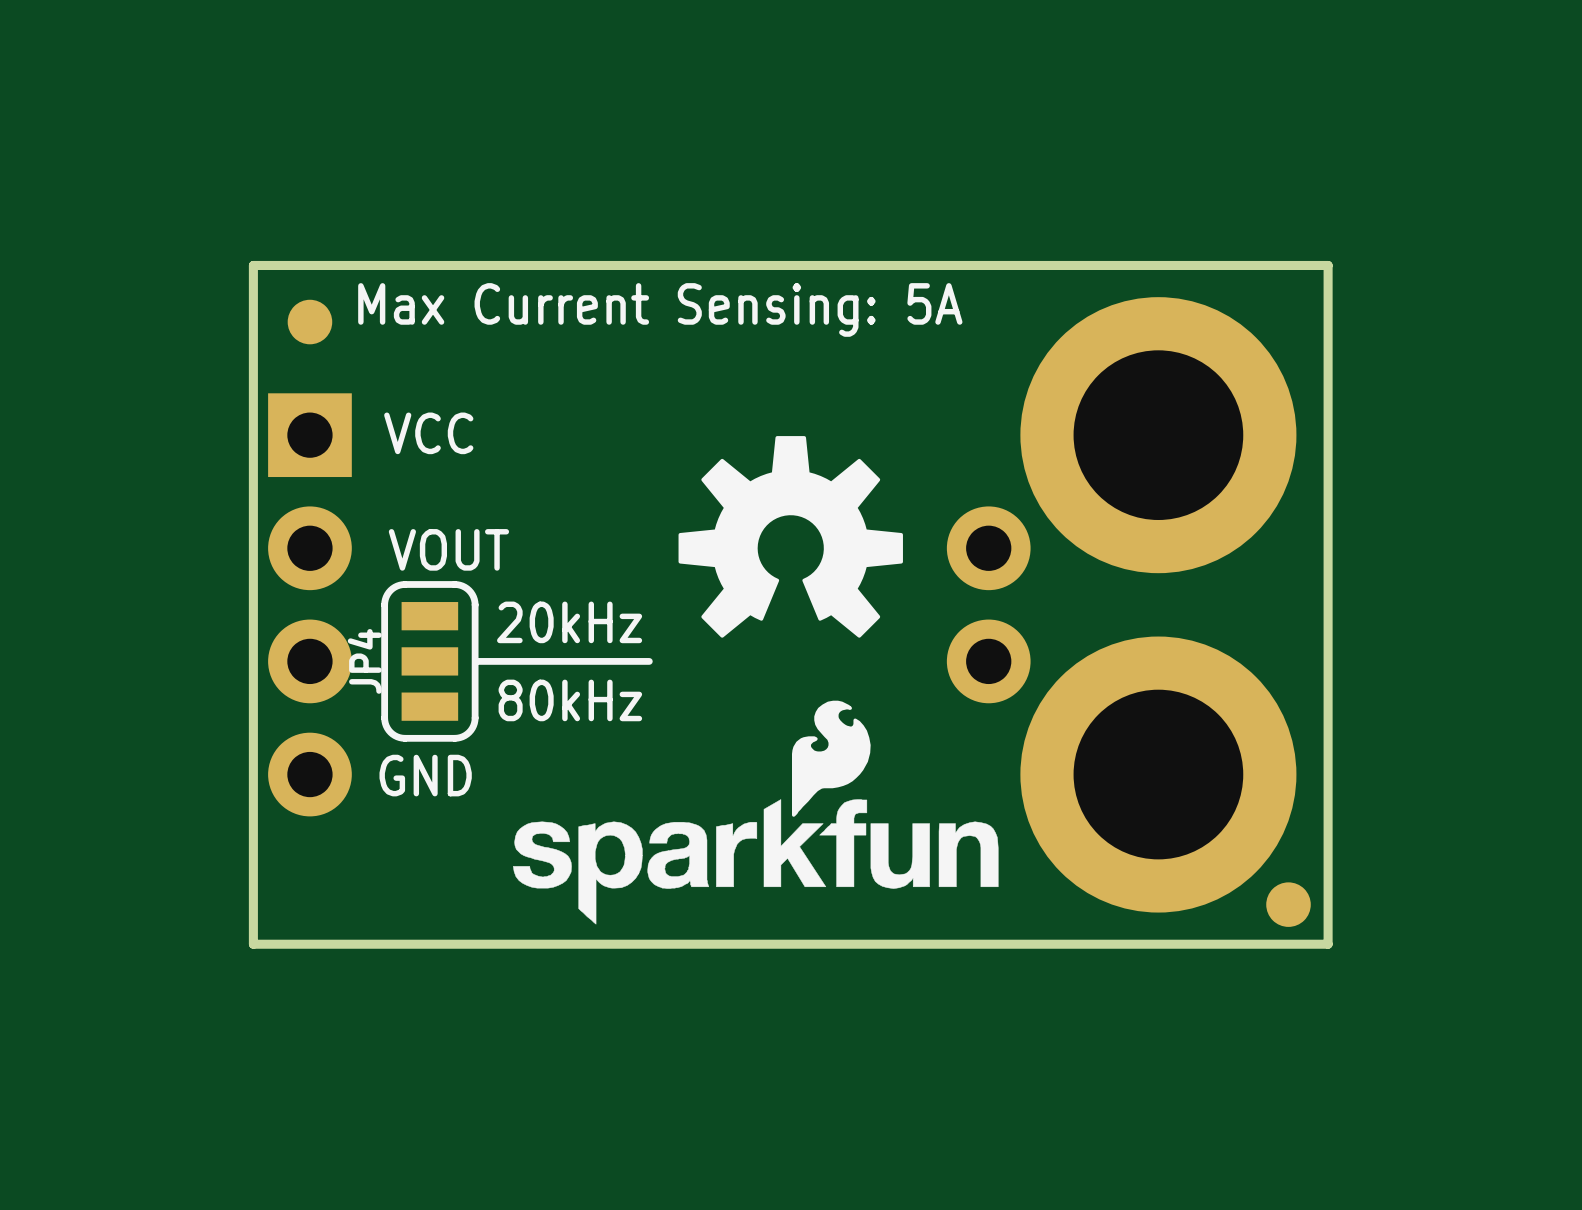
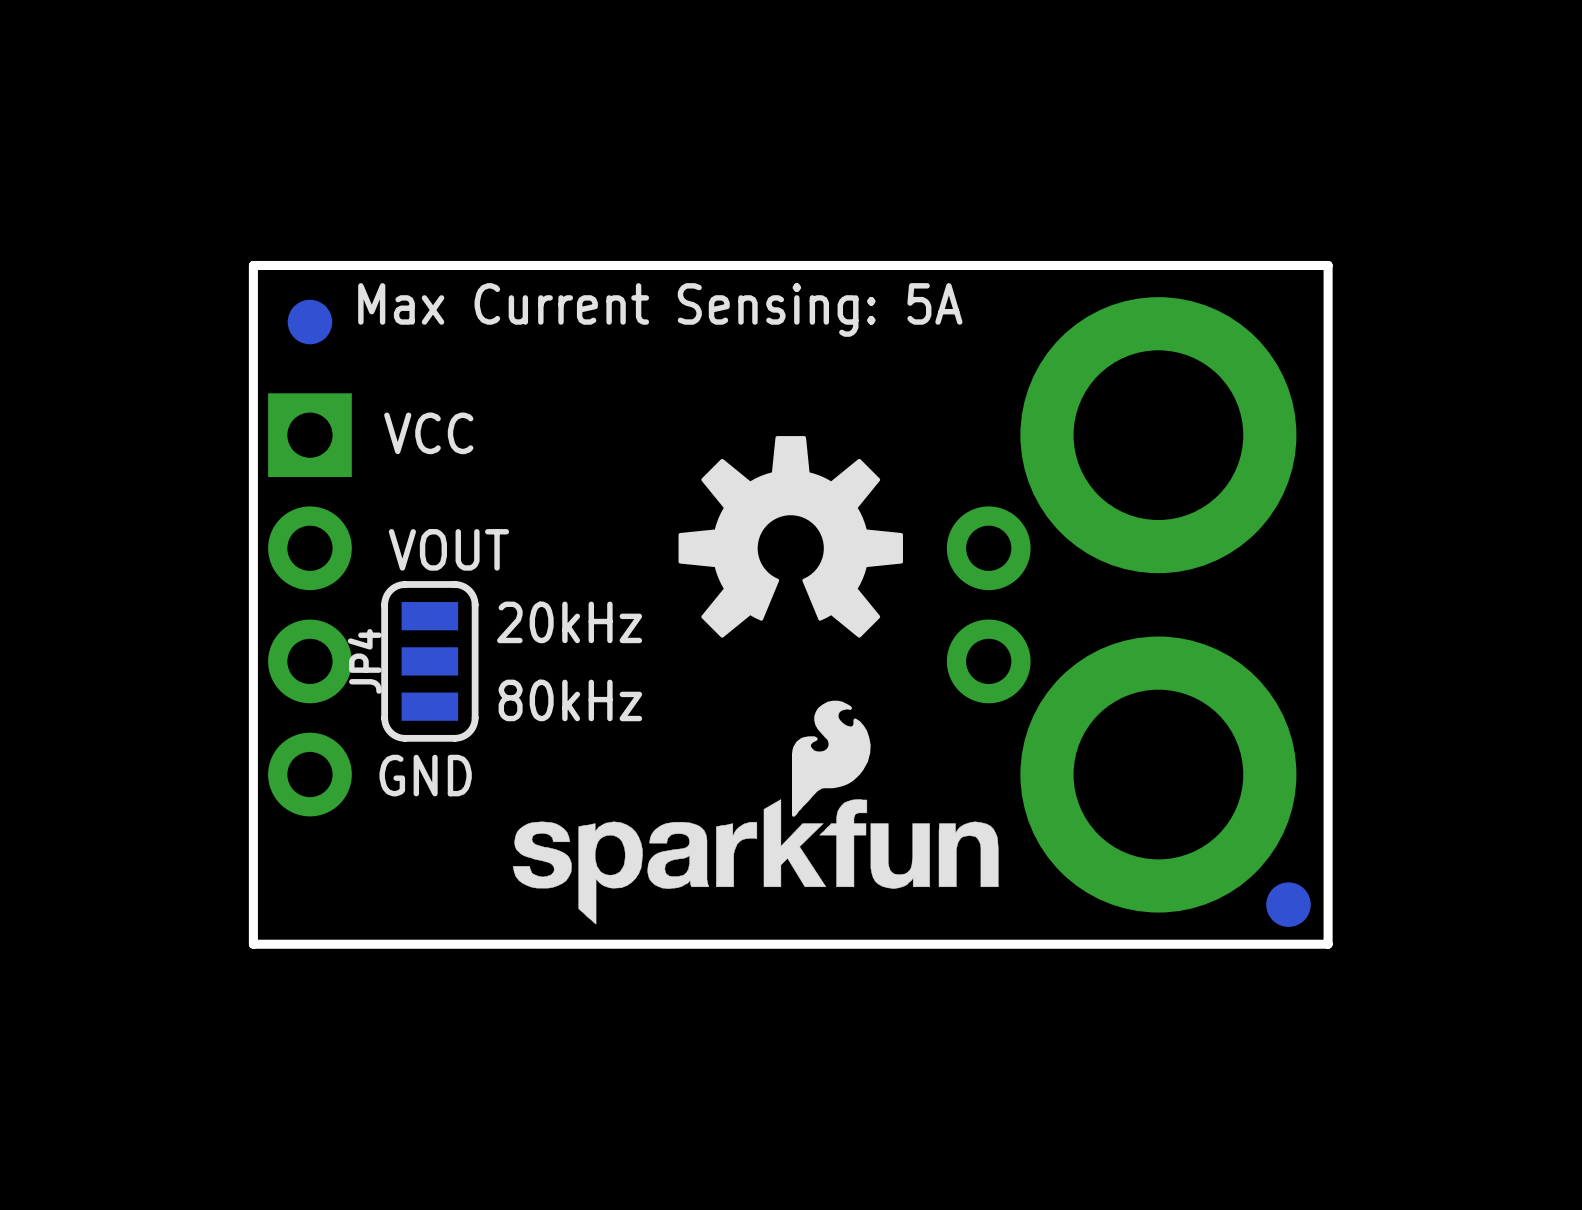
line: (649, 661) (476, 661) -> none

